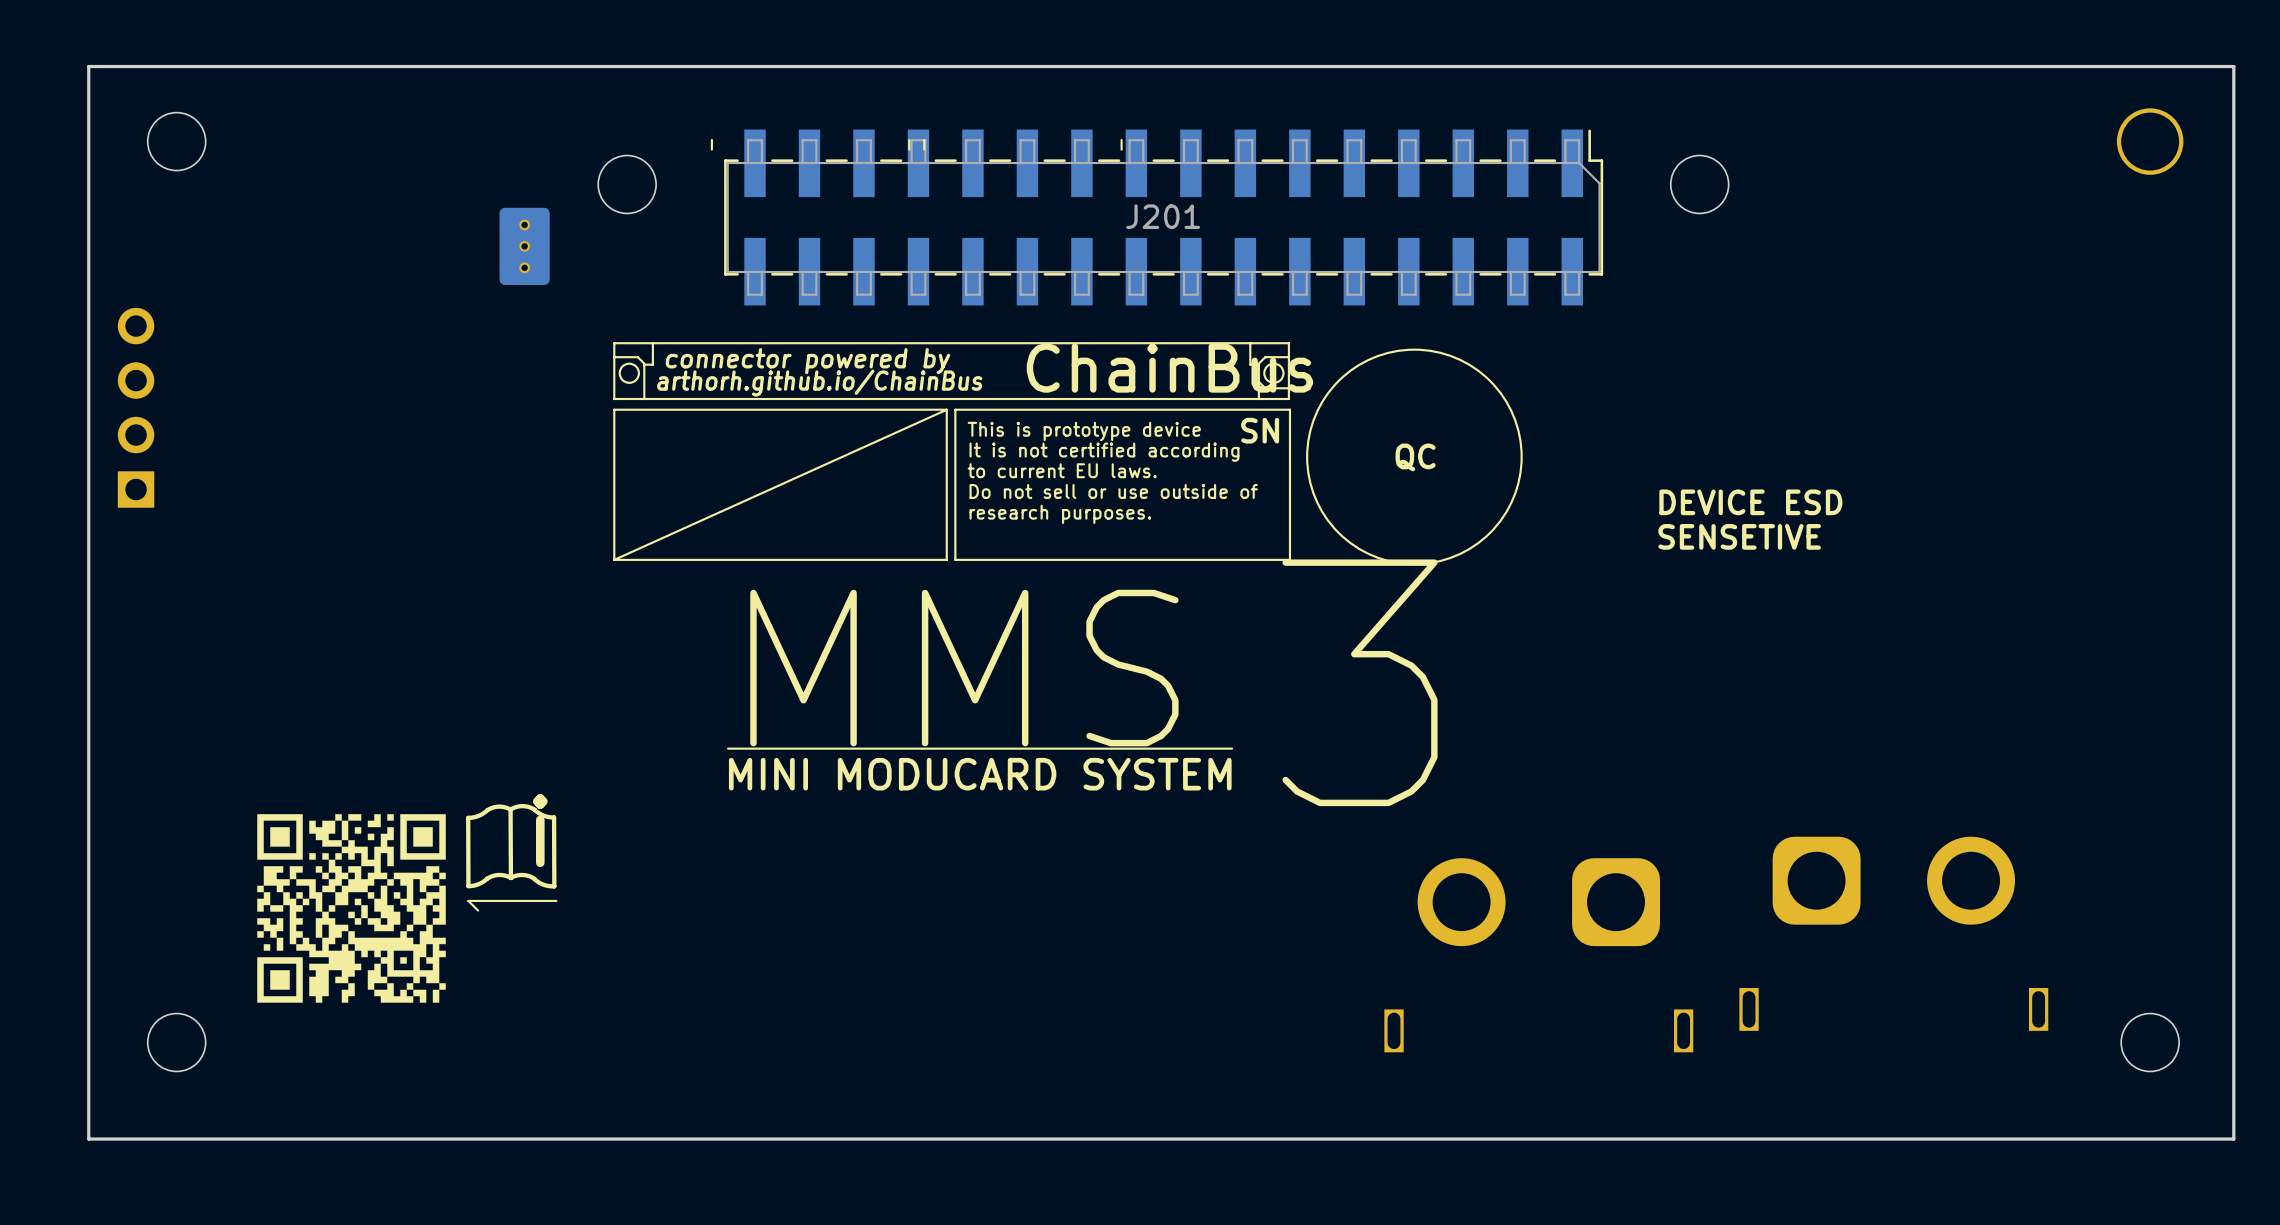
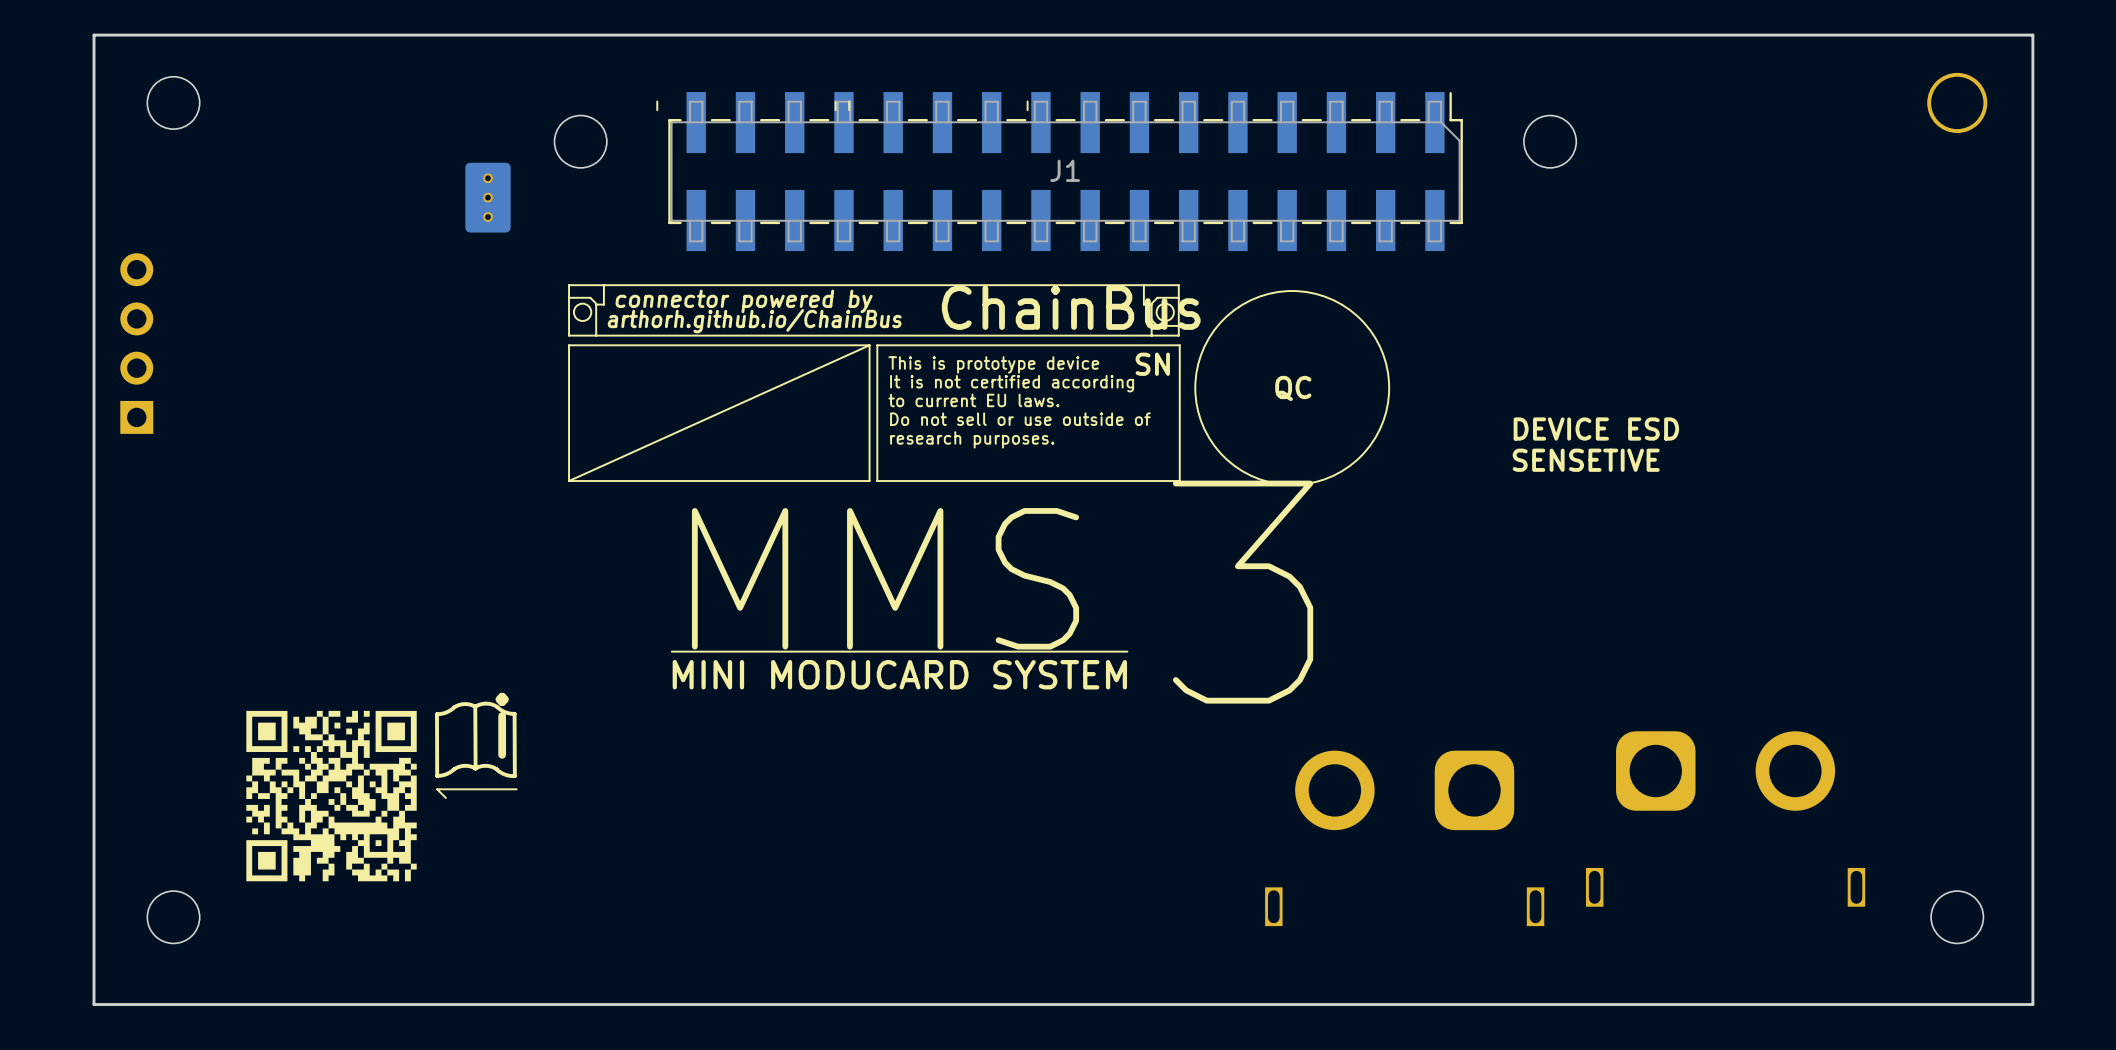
J201 name: J201 (1163, 216) -> J1 (1065, 170)

